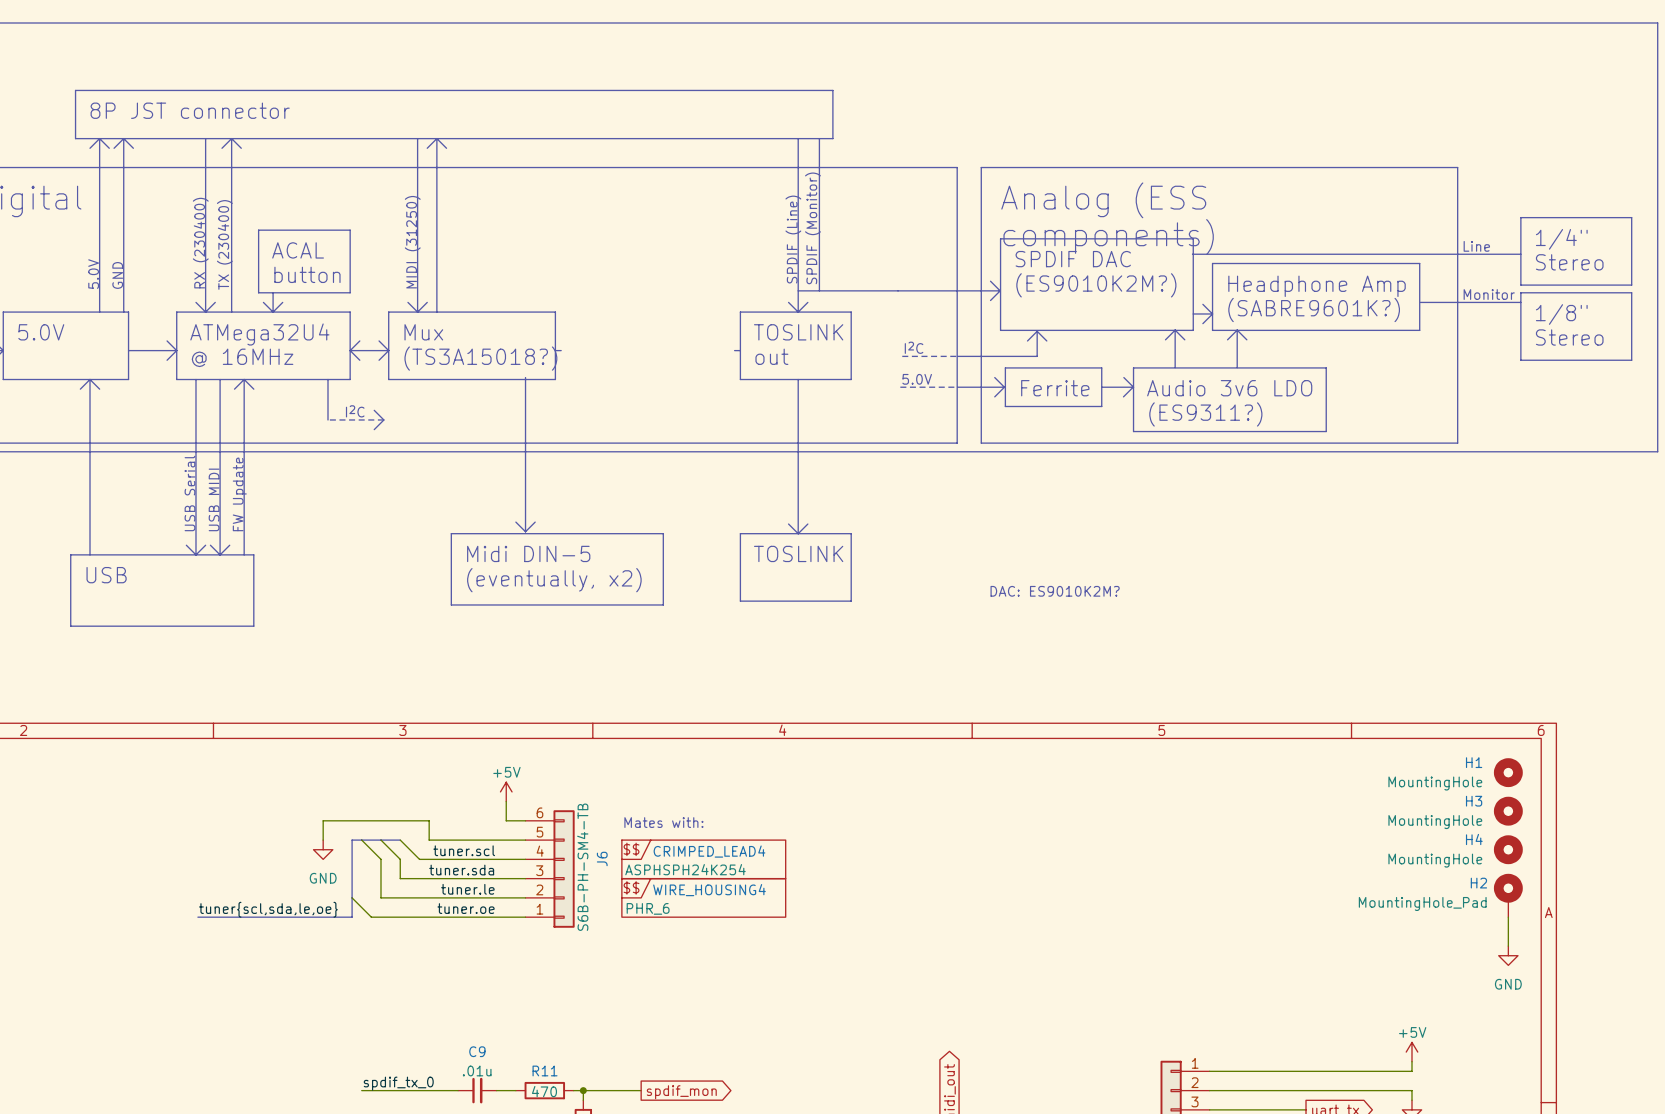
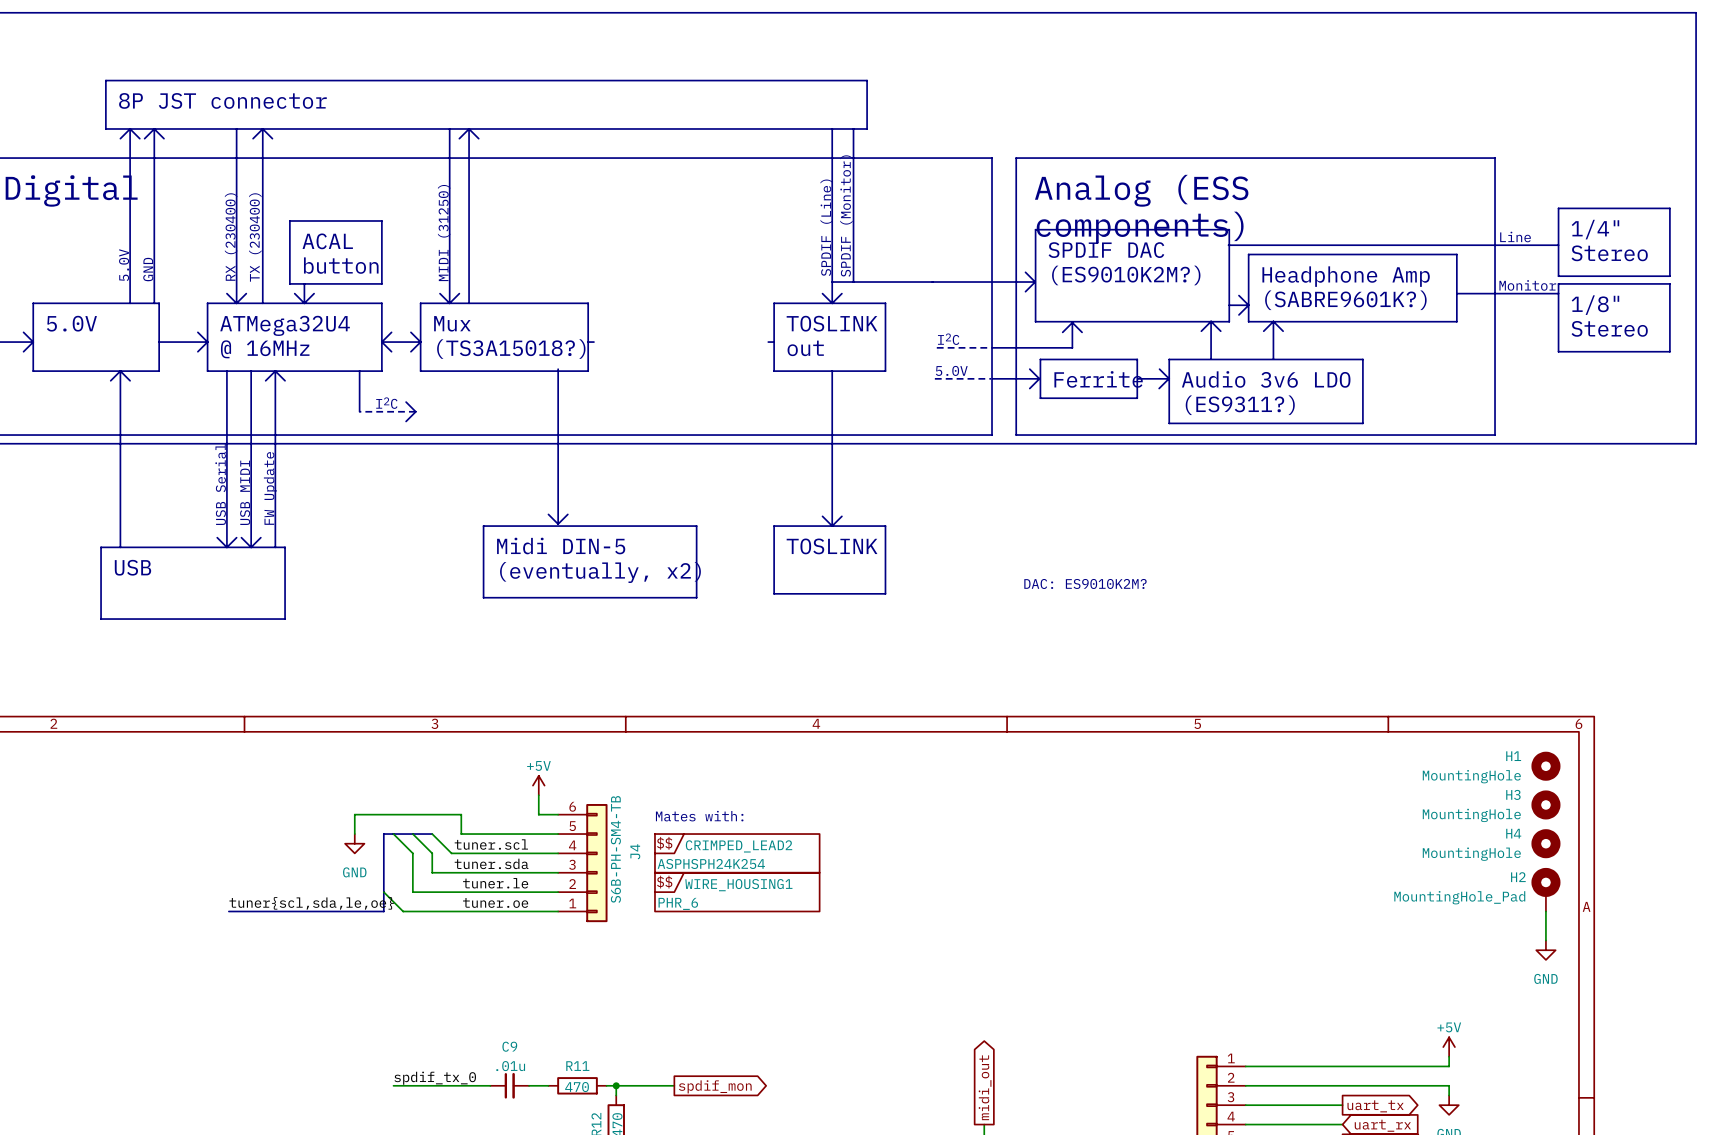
CRIMPED_LEAD4 name: CRIMPED_LEAD4 (709, 851) -> CRIMPED_LEAD2 (739, 846)
J6 name: J6 (602, 858) -> J4 (635, 851)
WIRE_HOUSING4 name: WIRE_HOUSING4 (709, 890) -> WIRE_HOUSING1 (738, 885)

